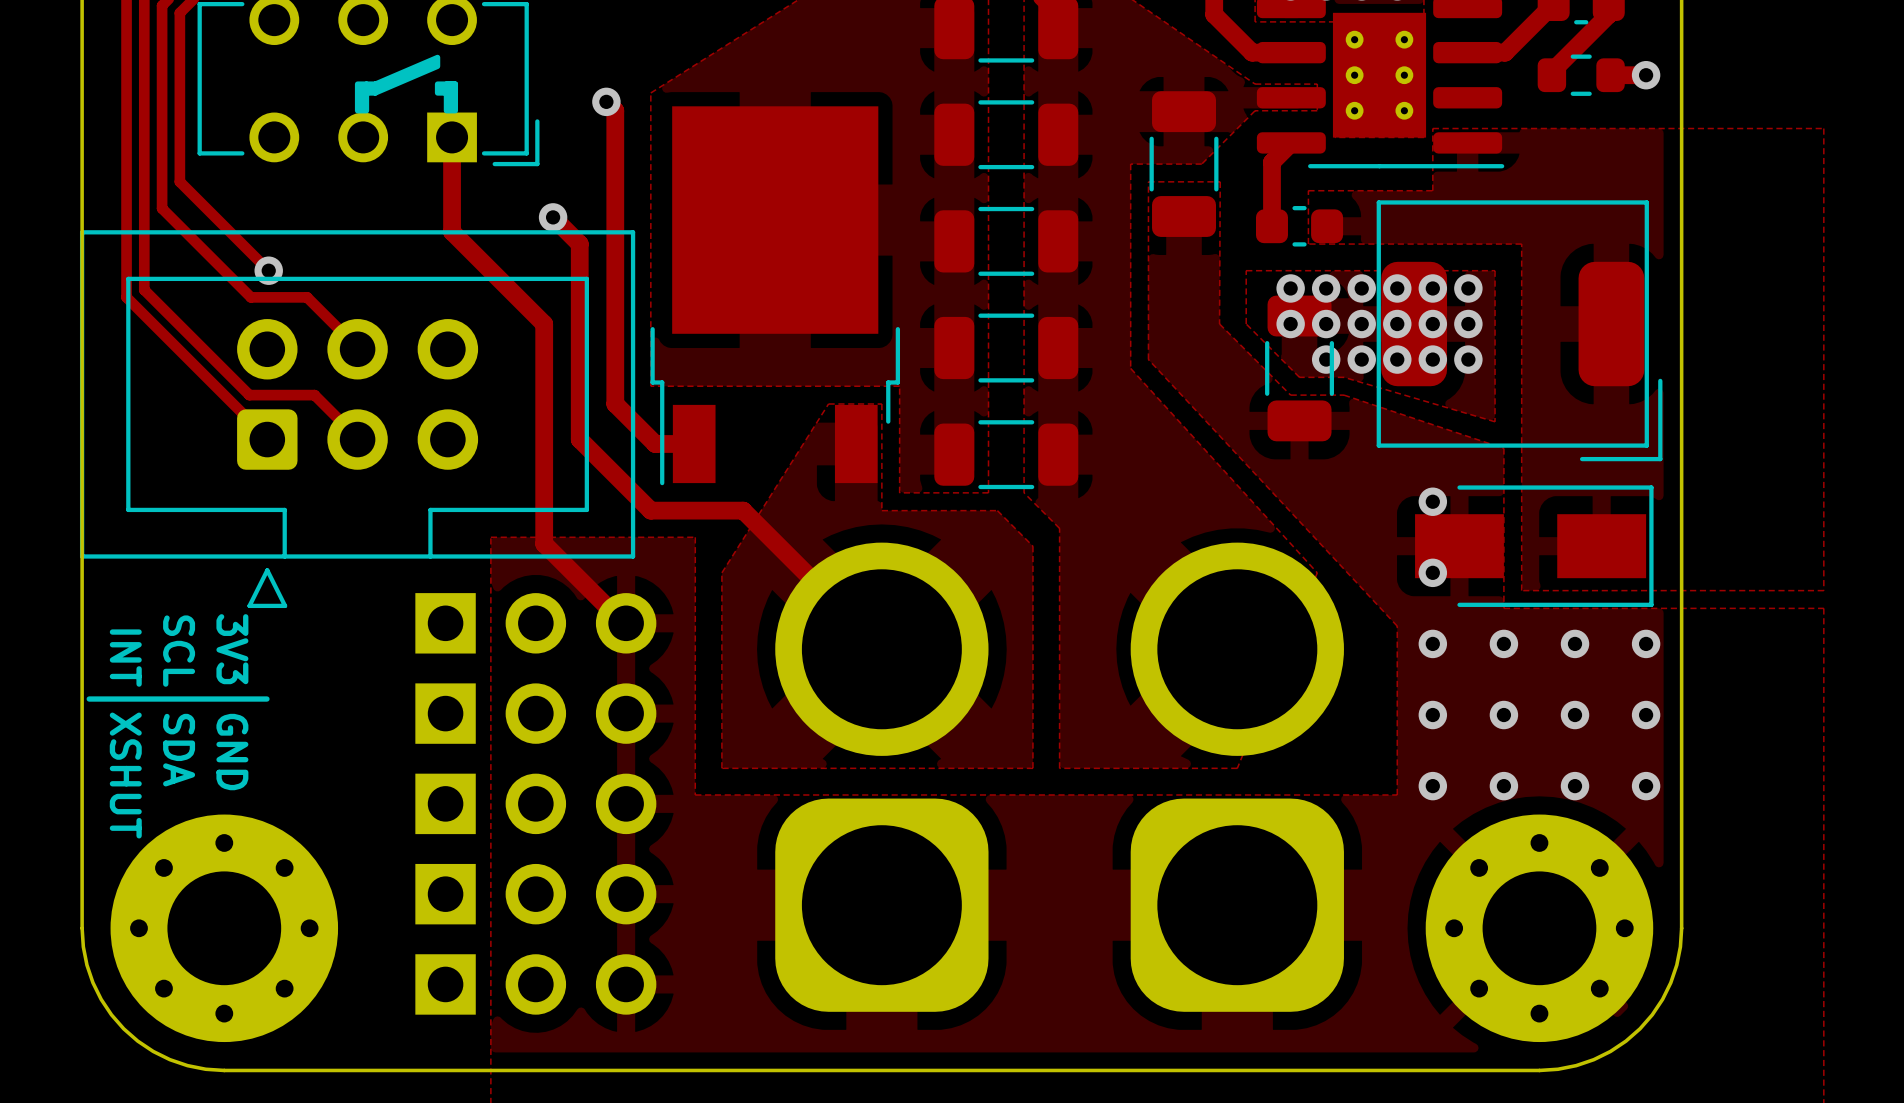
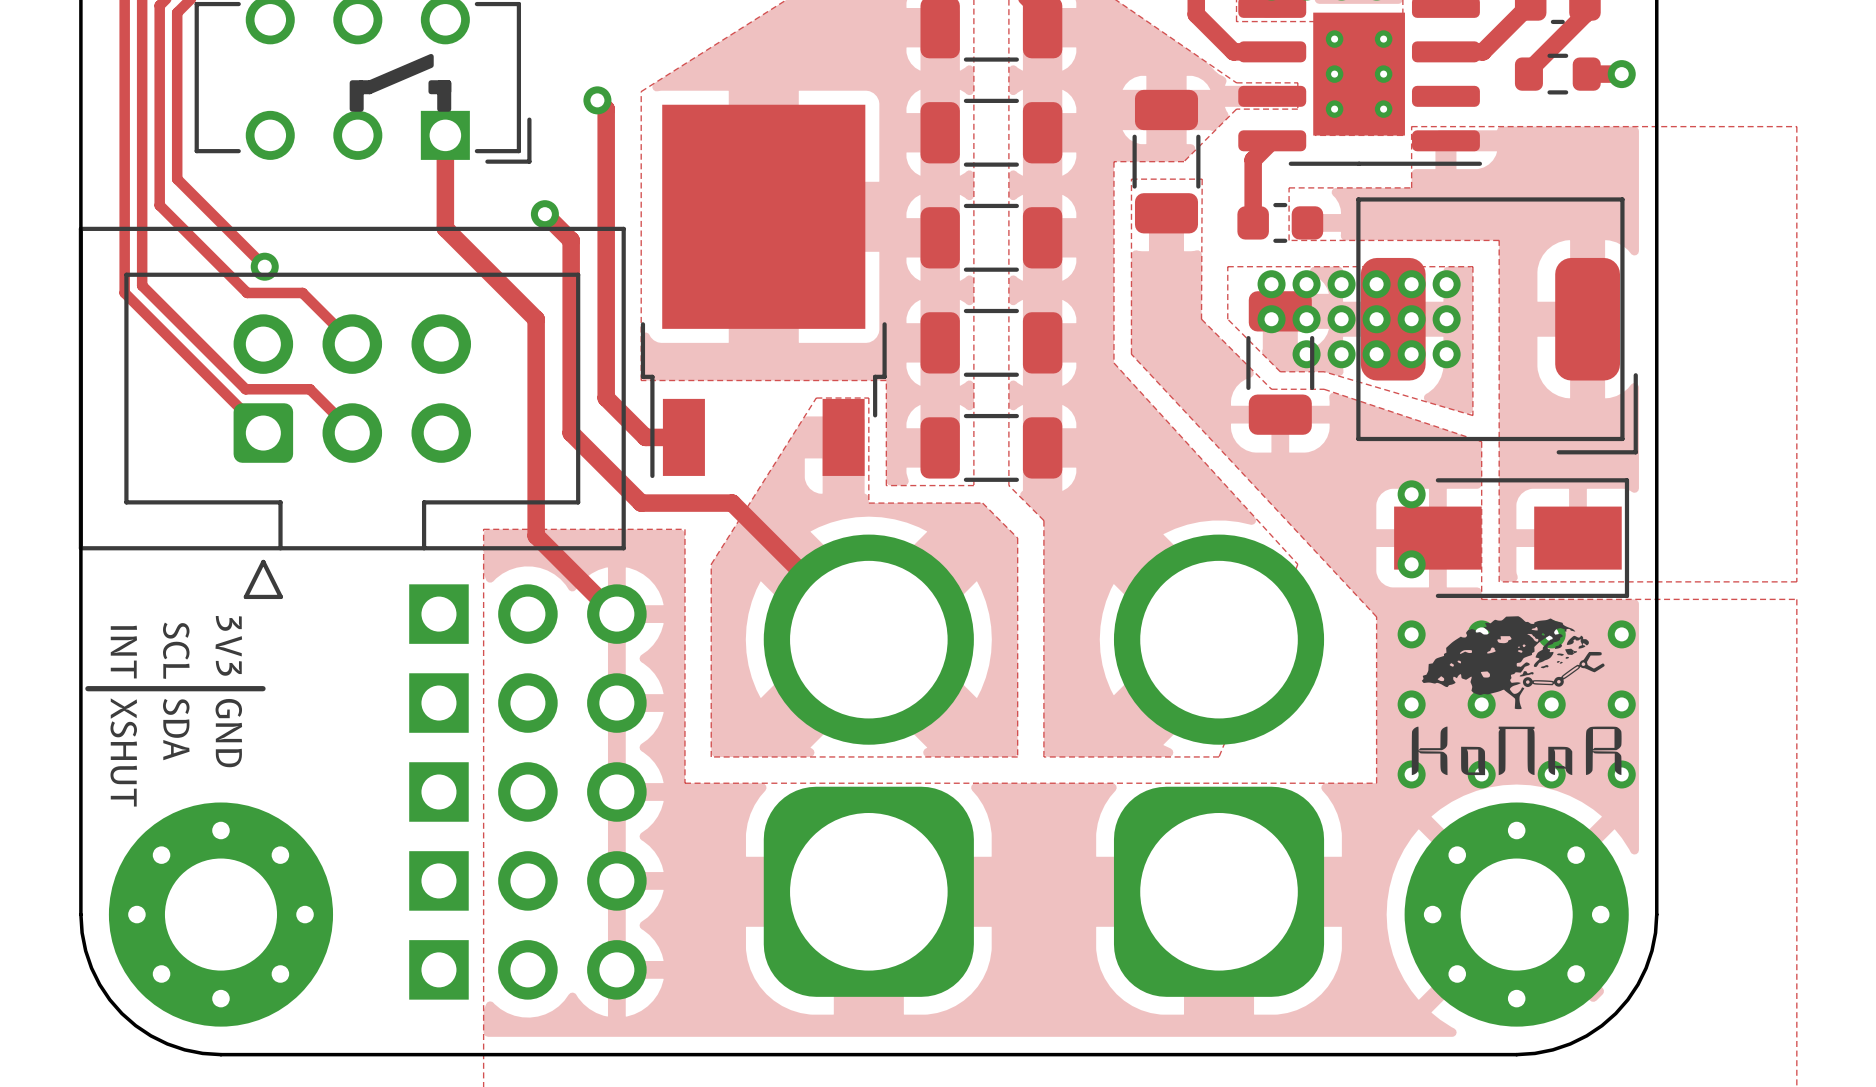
drawing: none -> [1411, 616, 1622, 776]

